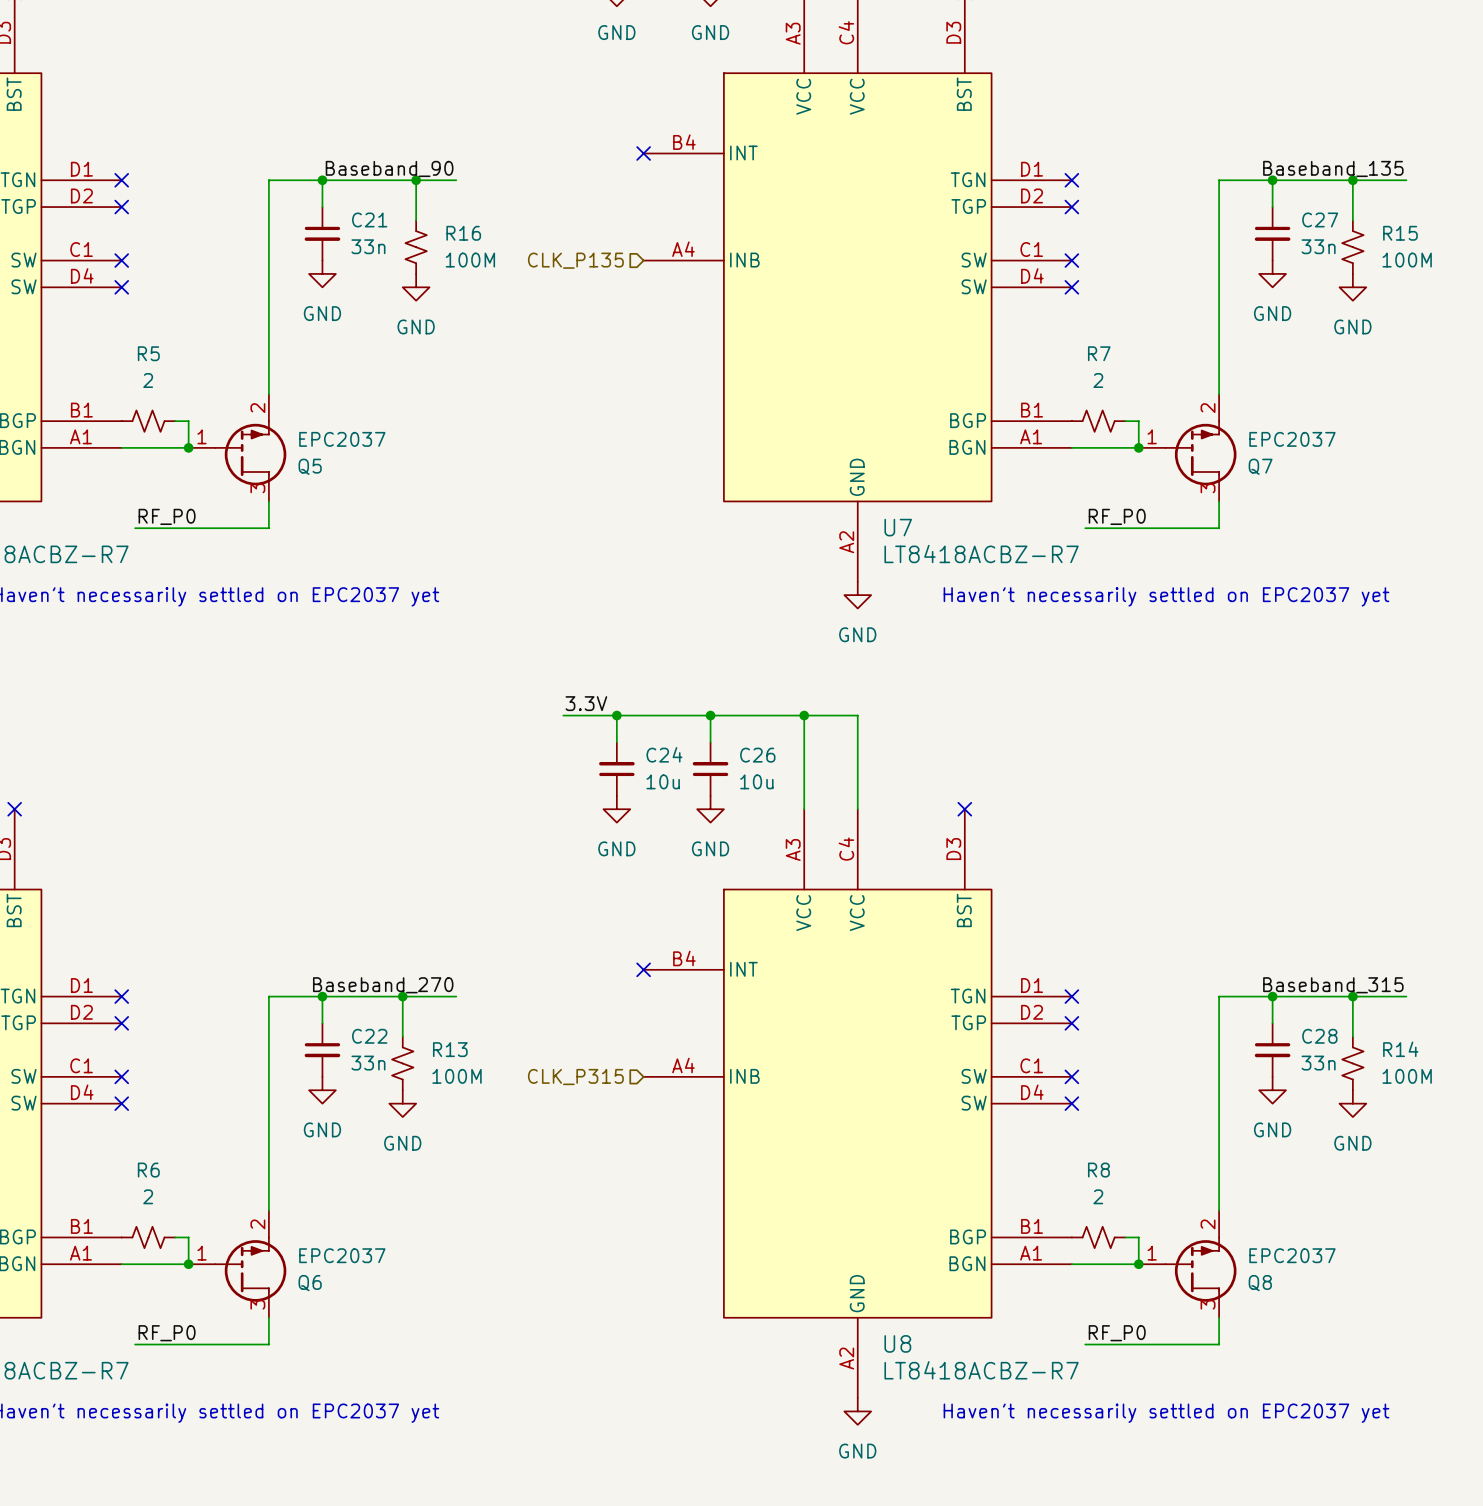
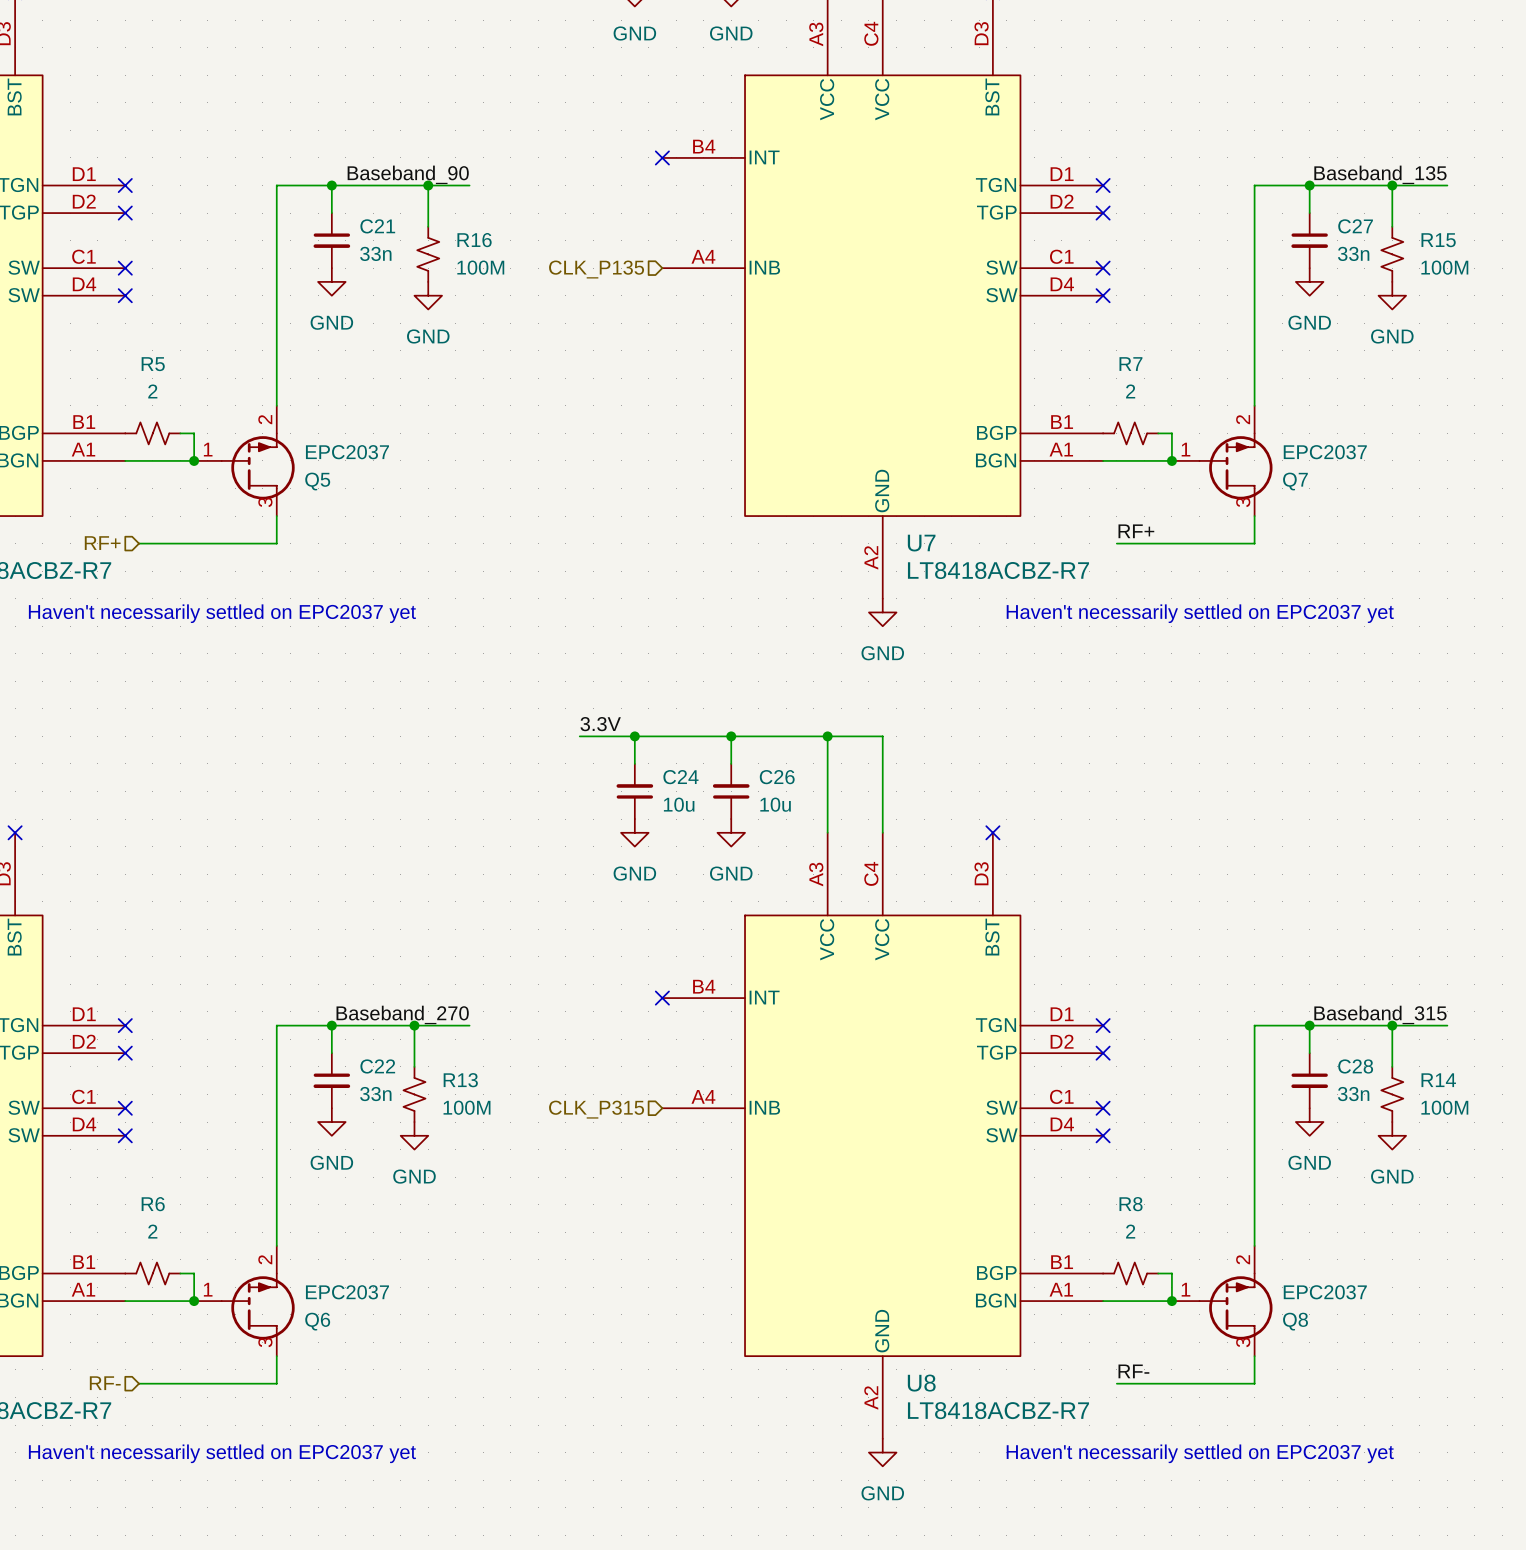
label: RF_P0 (167, 516) -> none
label: RF_P0 (1117, 516) -> RF+ (1136, 531)
hierarchical label: none -> RF+ (102, 543)
label: RF_P0 (167, 1333) -> none
label: RF_P0 (1117, 1333) -> RF- (1133, 1371)
hierarchical label: none -> RF- (105, 1383)

